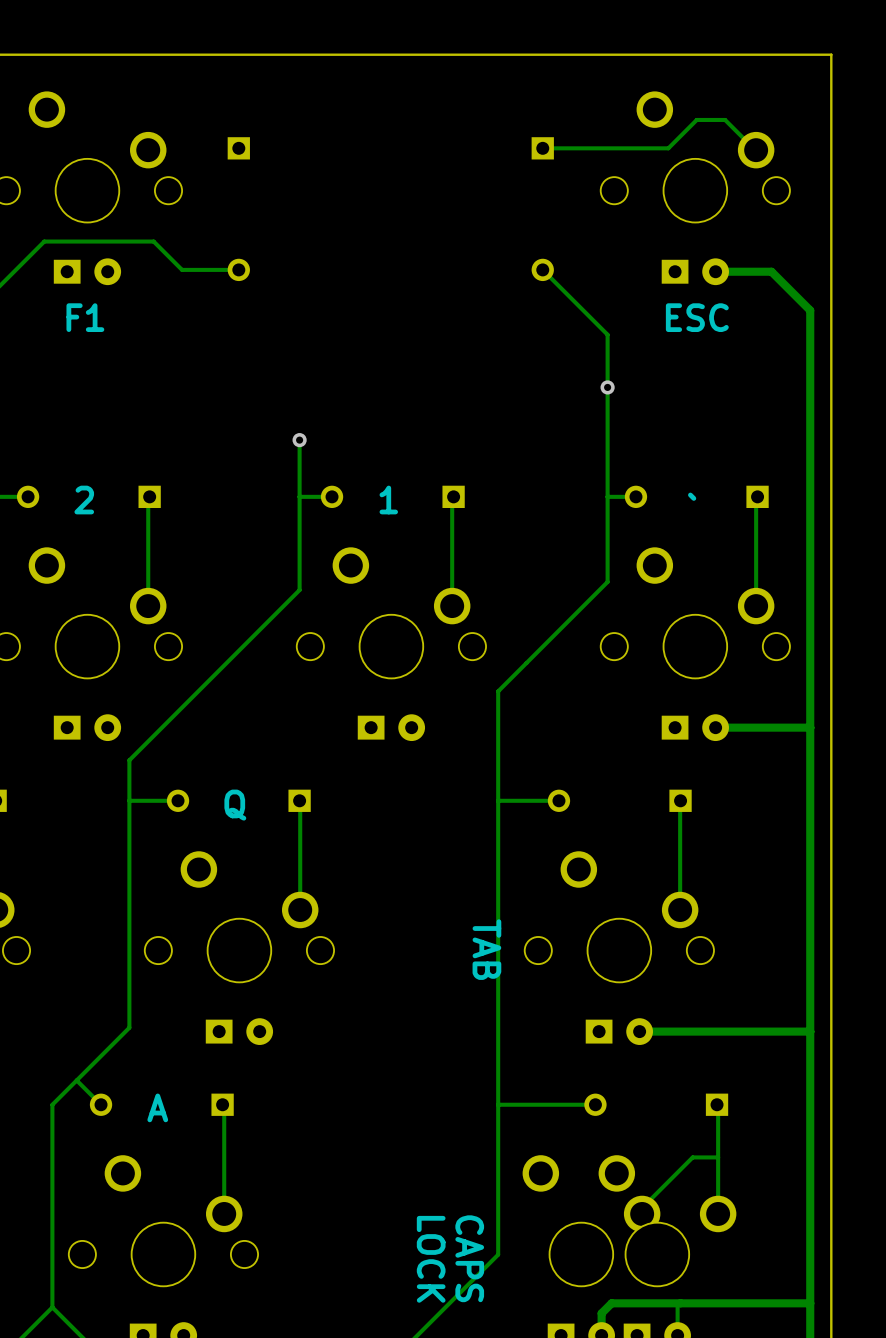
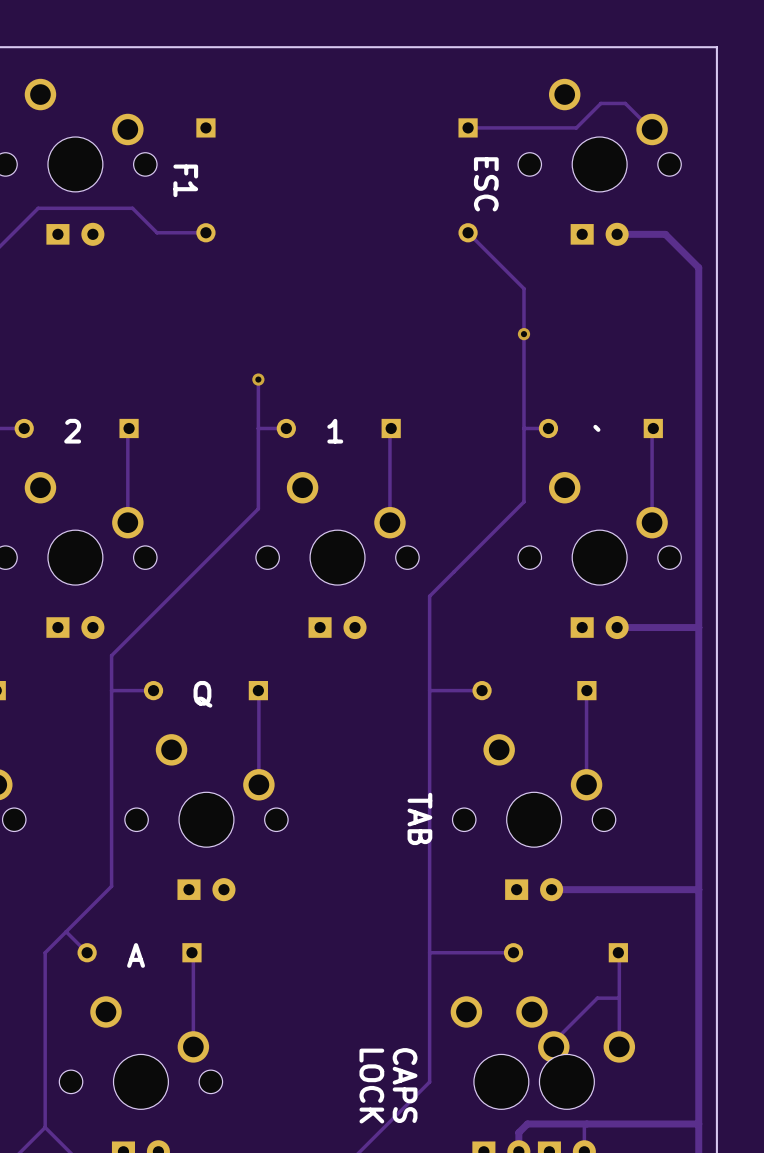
text rotation: 0° (85, 317) -> 90° clockwise (185, 180)
text position: F1 (85, 317) -> F1 (185, 180)
text rotation: 0° (697, 317) -> 90° clockwise (486, 184)
text position: ESC (697, 317) -> ESC (486, 184)

